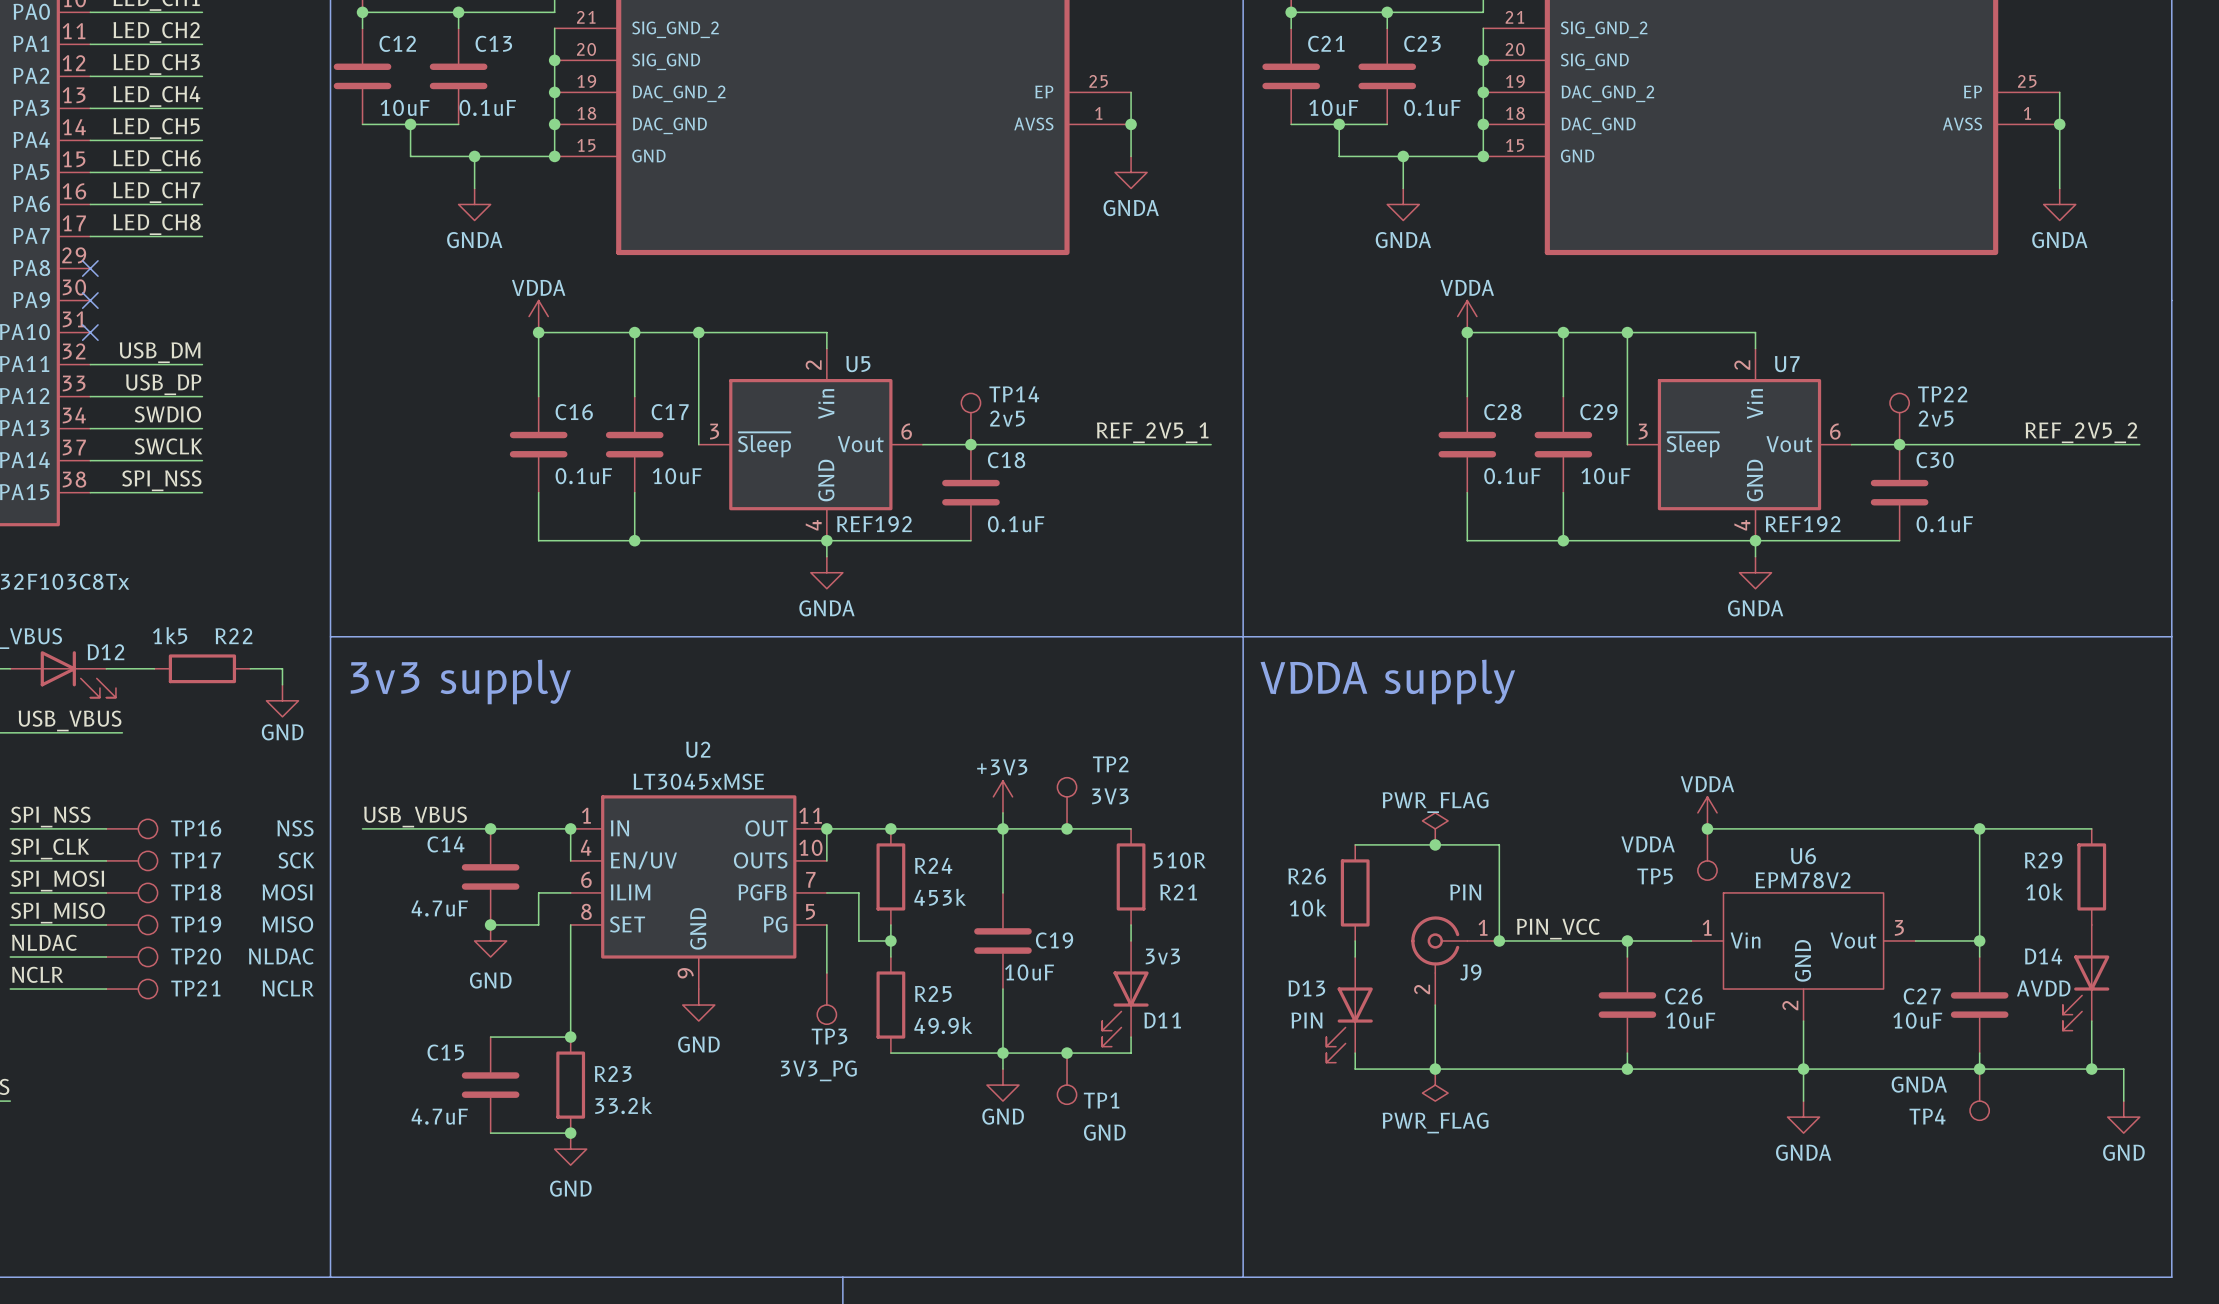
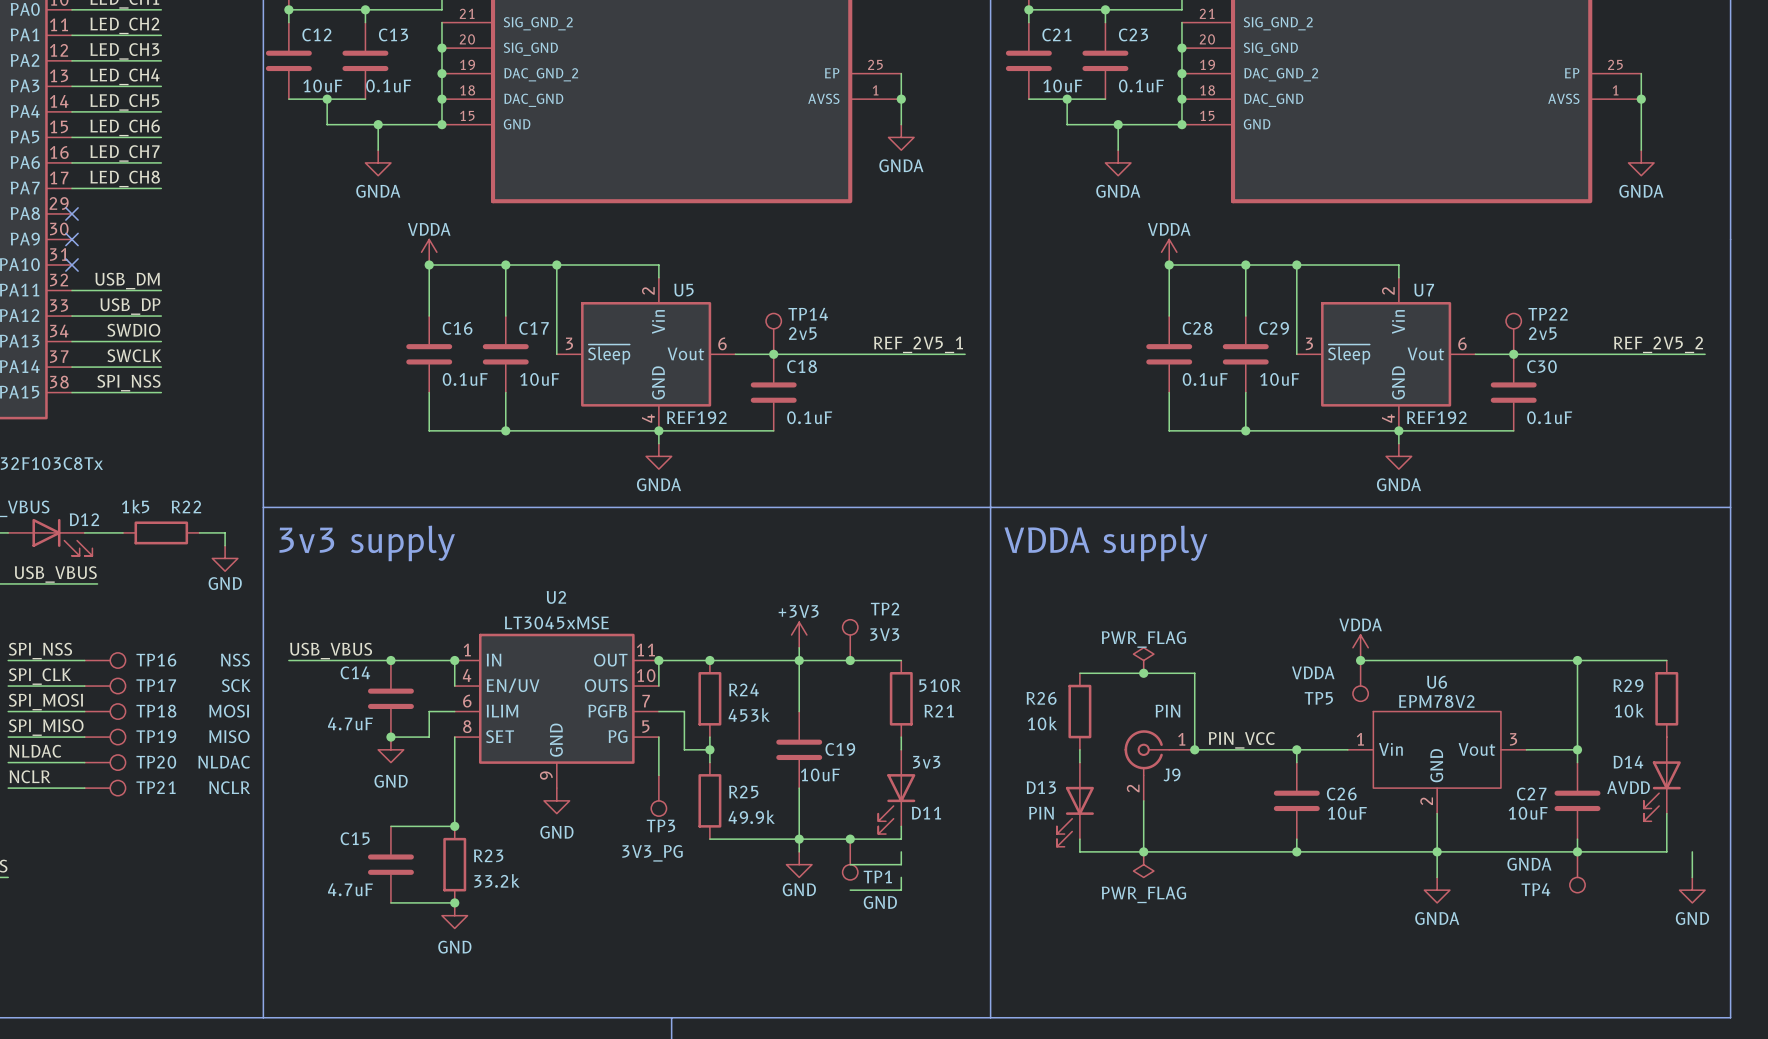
wire: none -> (901, 851) (901, 864) (850, 864)
wire: (2091, 1069) (2123, 1069) -> none
junction: (2091, 1069) -> none
wire: none -> (901, 877) (901, 890) (850, 890)

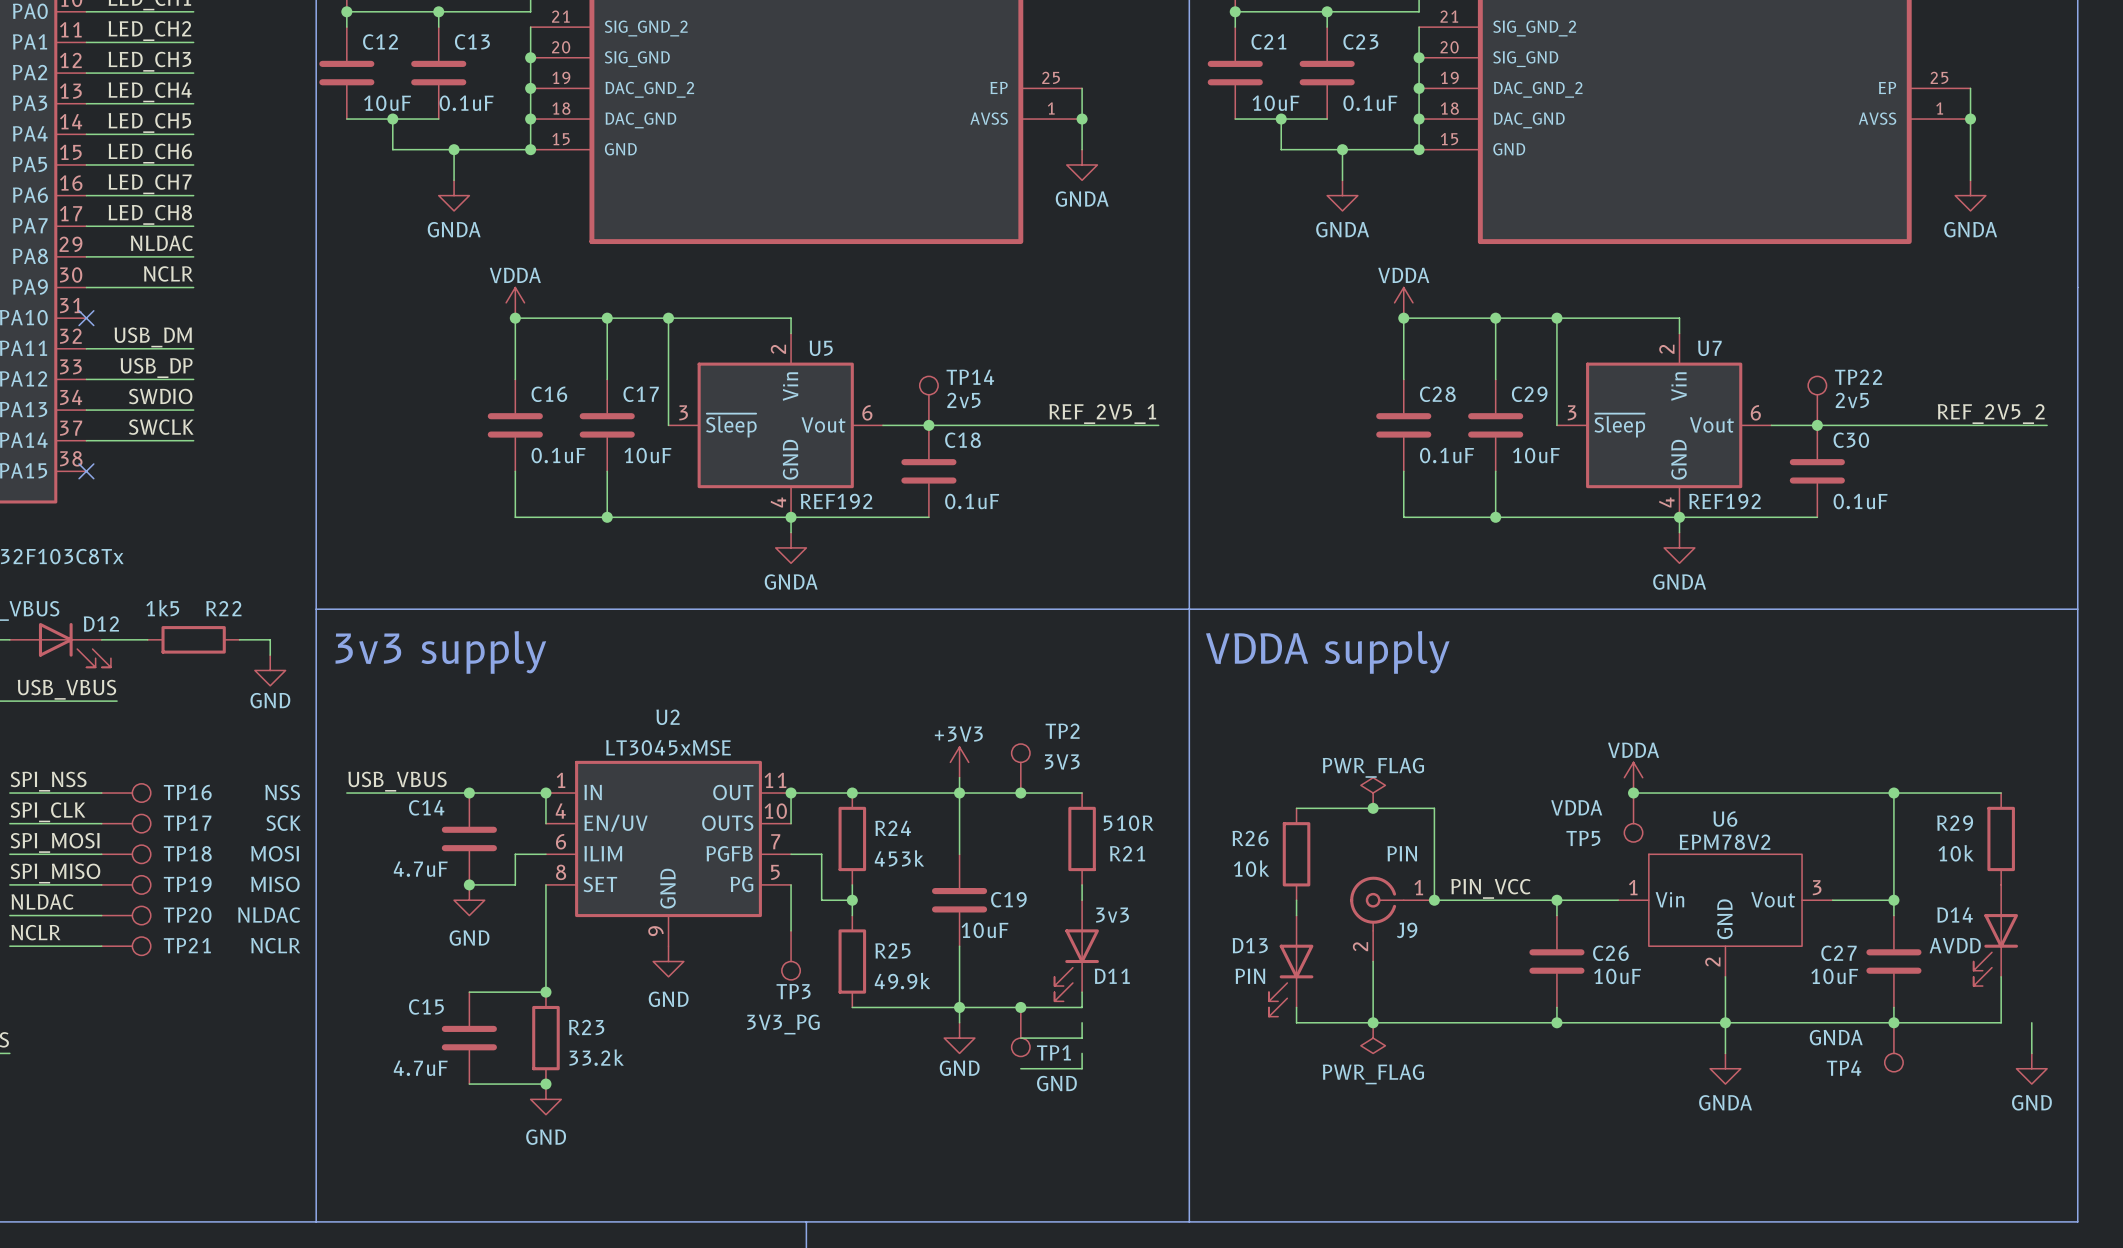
label: none -> NLDAC (161, 243)
wire: none -> (86, 256) (193, 256)
no-connect mark: (71, 213) -> none
label: none -> NCLR (168, 273)
no-connect mark: (71, 239) -> none
label: SPI_NSS (128, 383) -> none
wire: (71, 392) (161, 392) -> (86, 287) (193, 287)
no-connect mark: none -> (86, 471)

